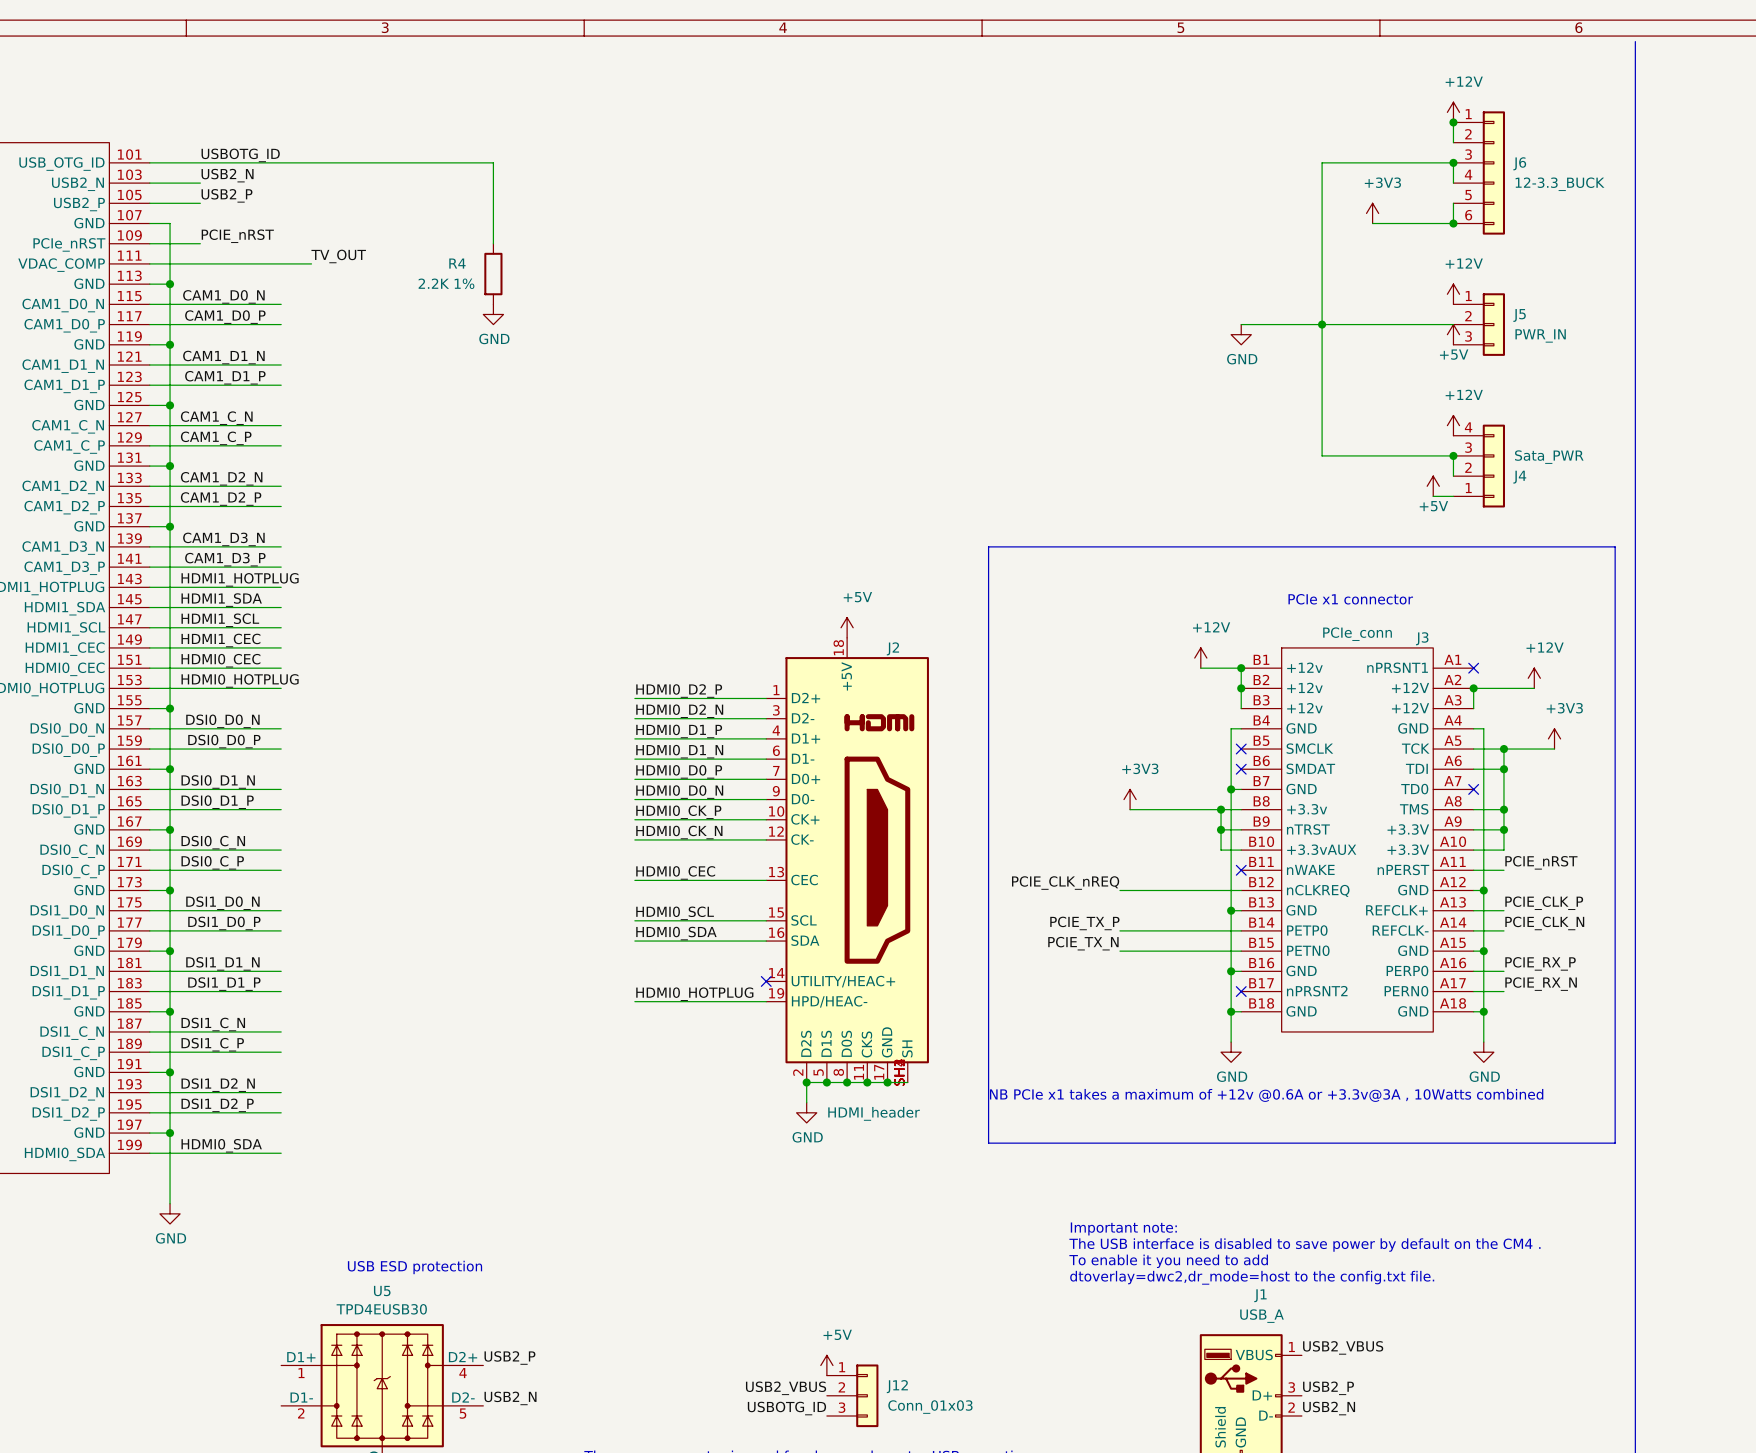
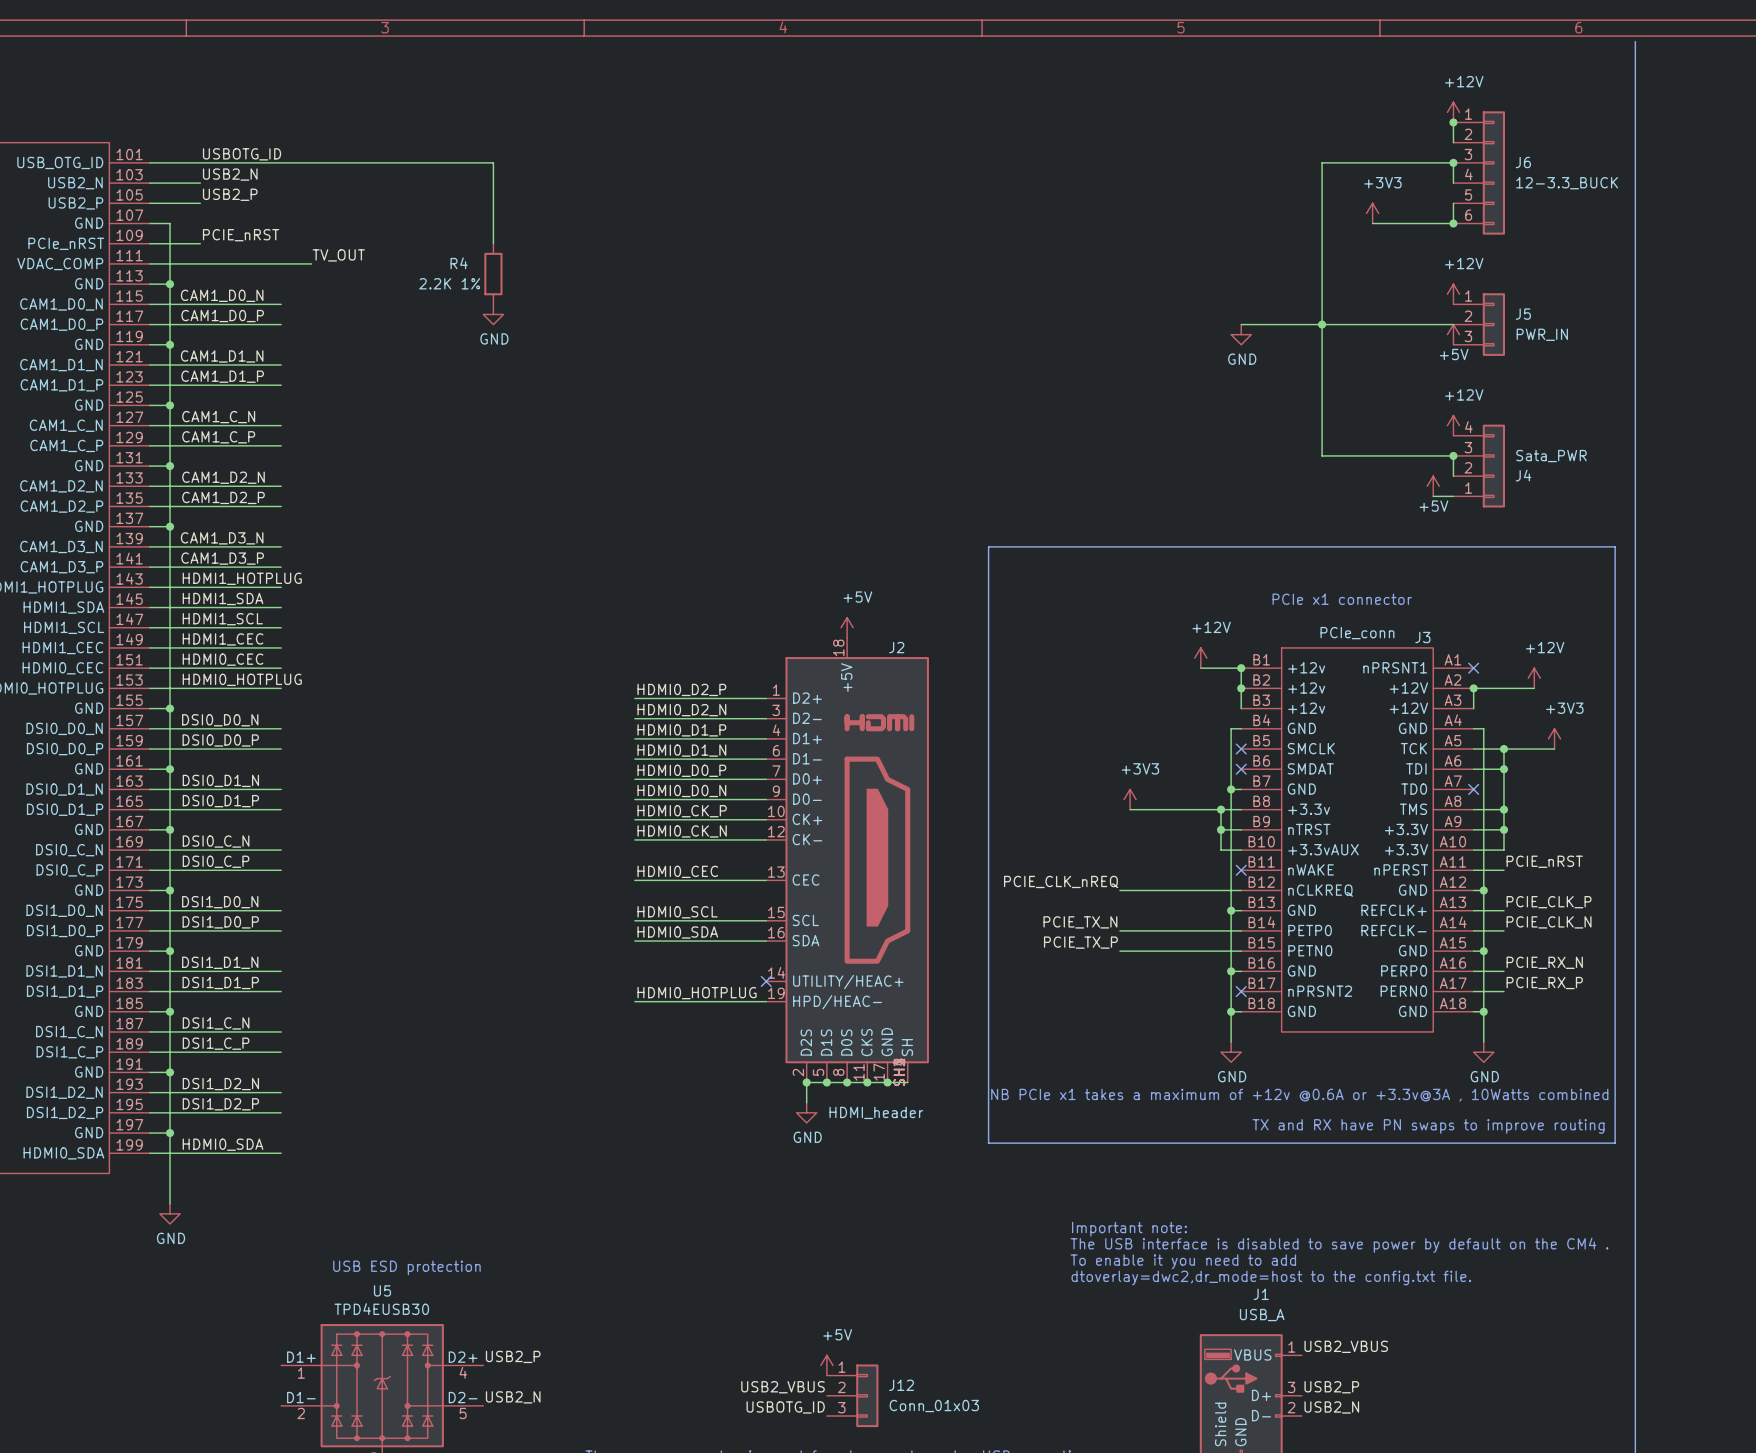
label: PCIE_TX_P (1084, 923) -> PCIE_TX_N (1080, 922)
label: PCIE_TX_N (1083, 943) -> PCIE_TX_P (1080, 942)
label: PCIE_RX_P (1540, 963) -> PCIE_RX_N (1544, 962)
label: PCIE_RX_N (1541, 984) -> PCIE_RX_P (1544, 983)
text: none -> TX and RX have PN swaps to improve routing (1428, 1126)

